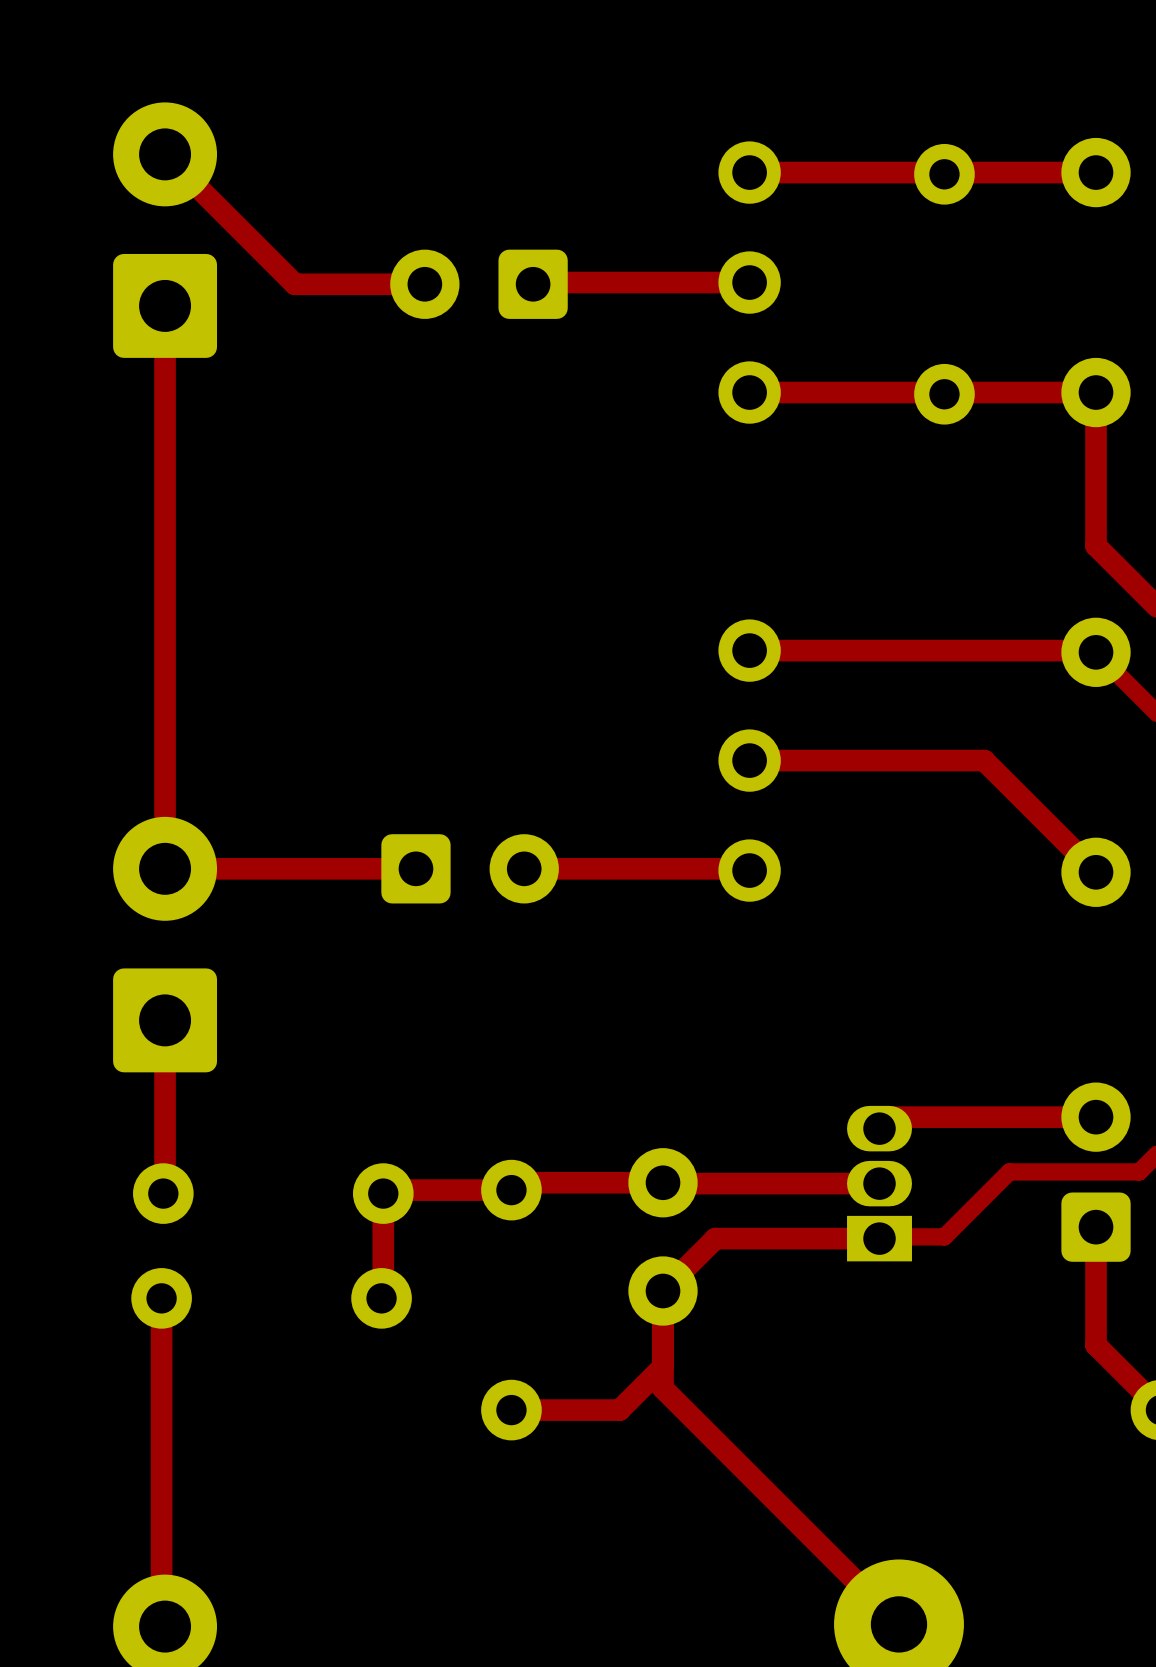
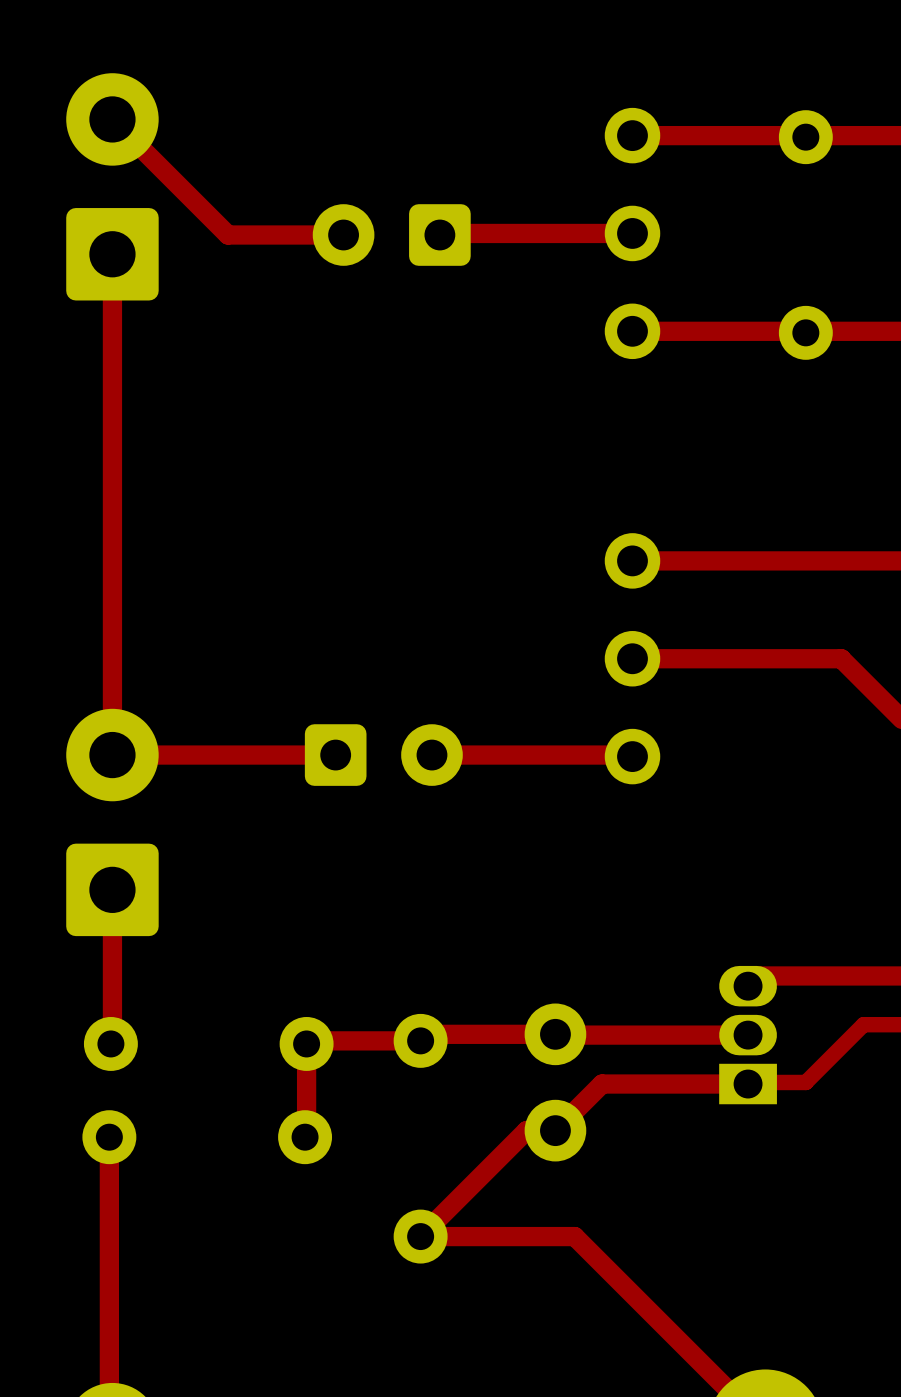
top track: (663, 1291) (663, 1388) (684, 1410) -> (555, 1130) (526, 1130) (420, 1236)
top track: (663, 1366) (619, 1410) -> (574, 1236) (516, 1236)

